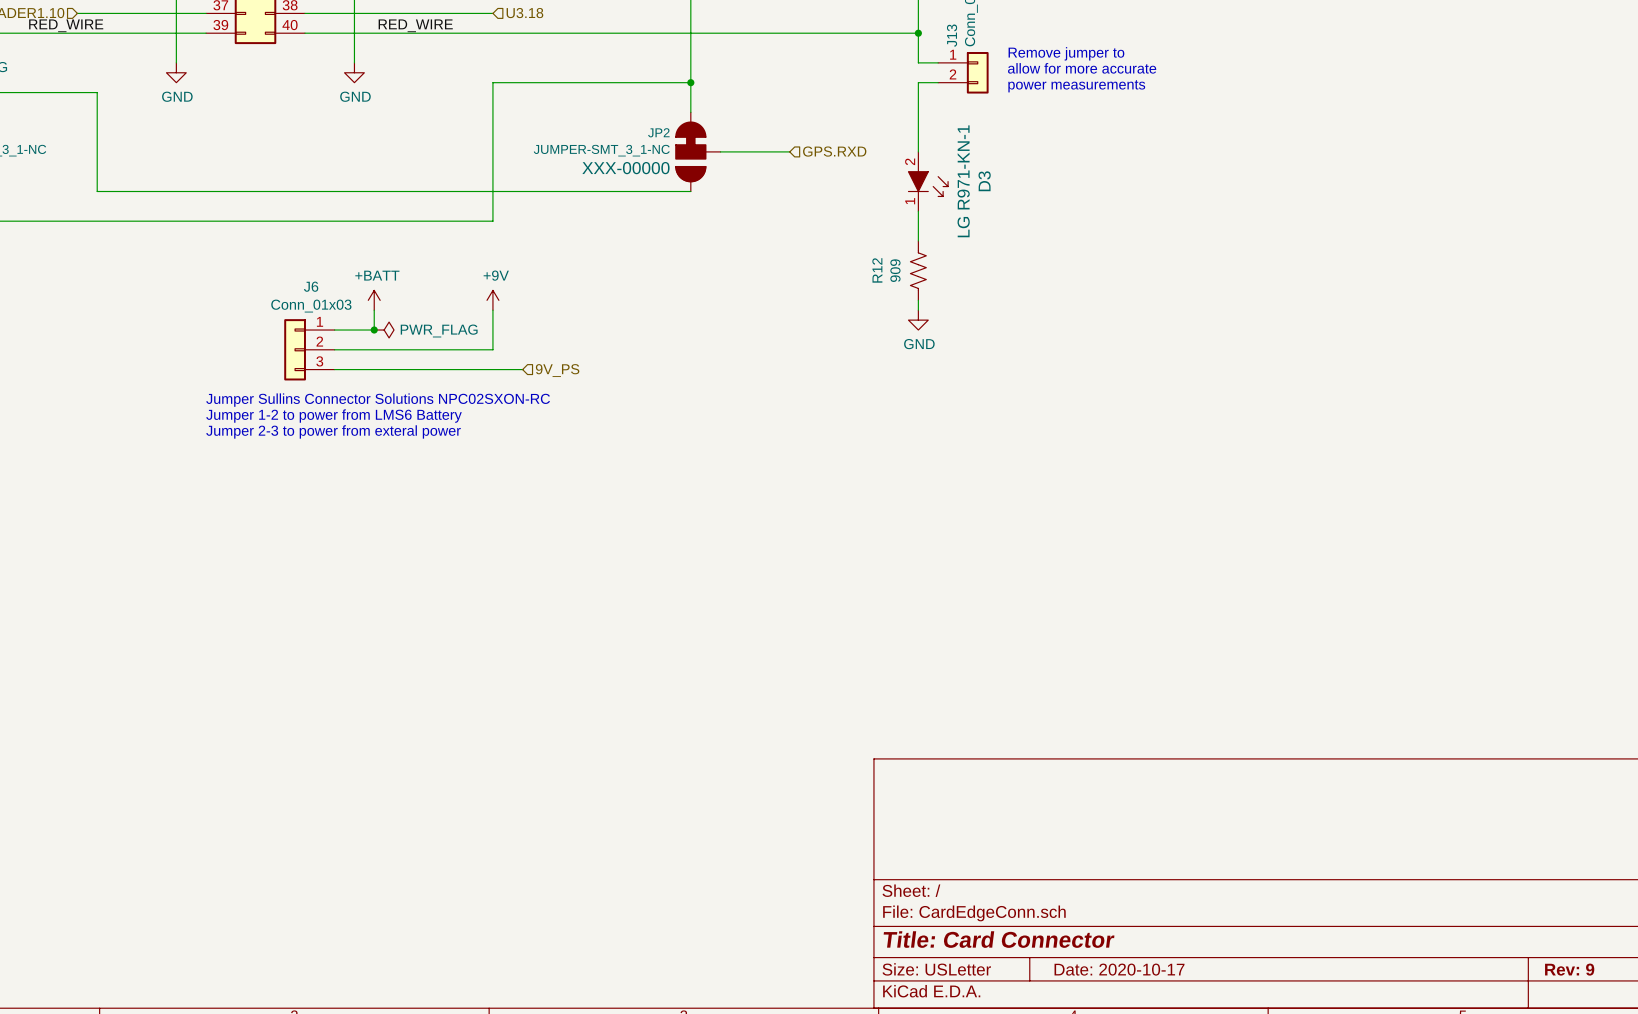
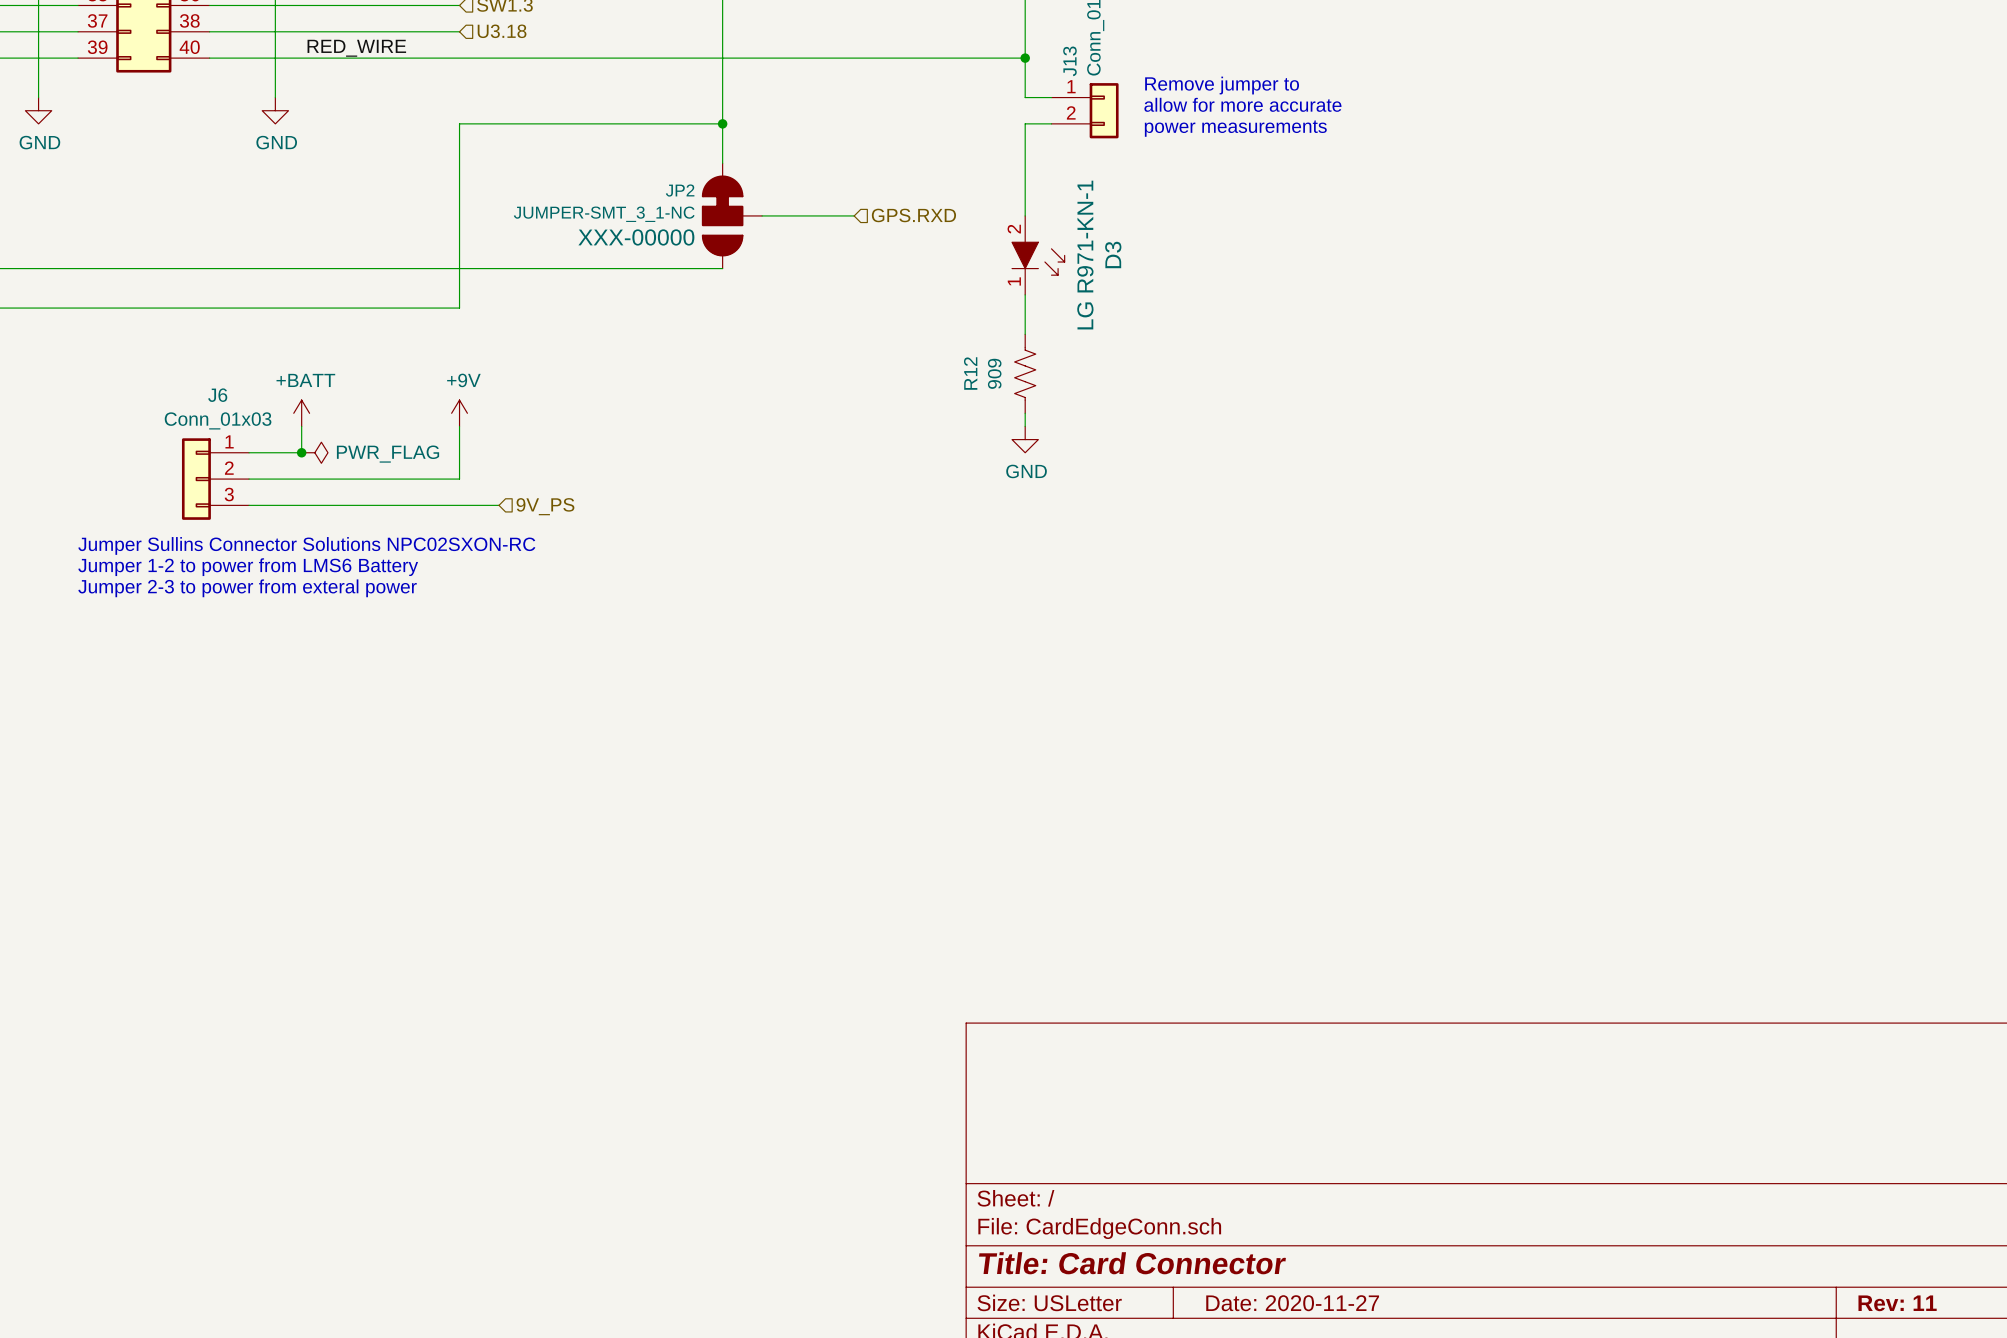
title block: Date: 2020-10-17 (1119, 969) -> Date: 2020-11-27 (1292, 1303)
title block: Rev: 9 (1569, 969) -> Rev: 11 (1897, 1303)

